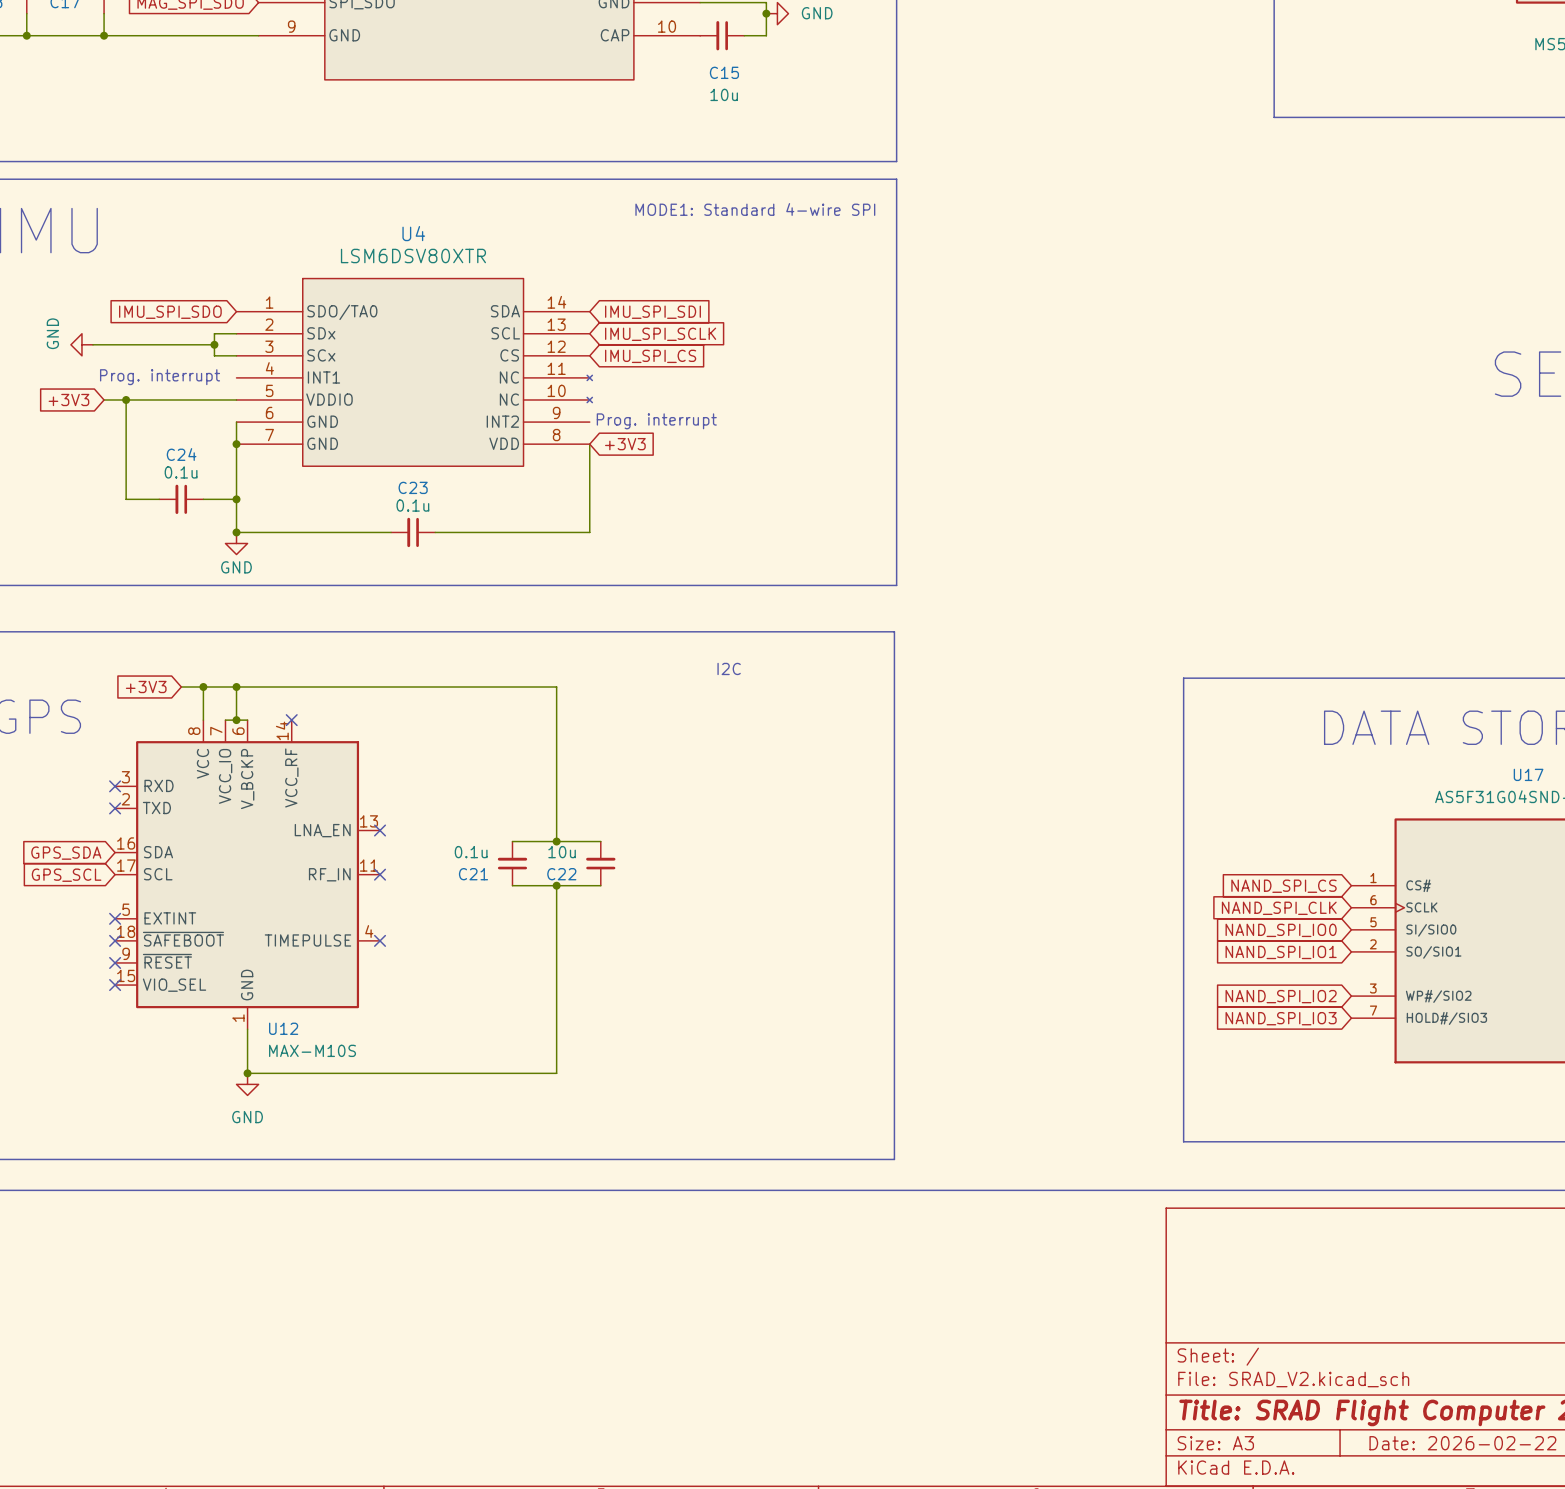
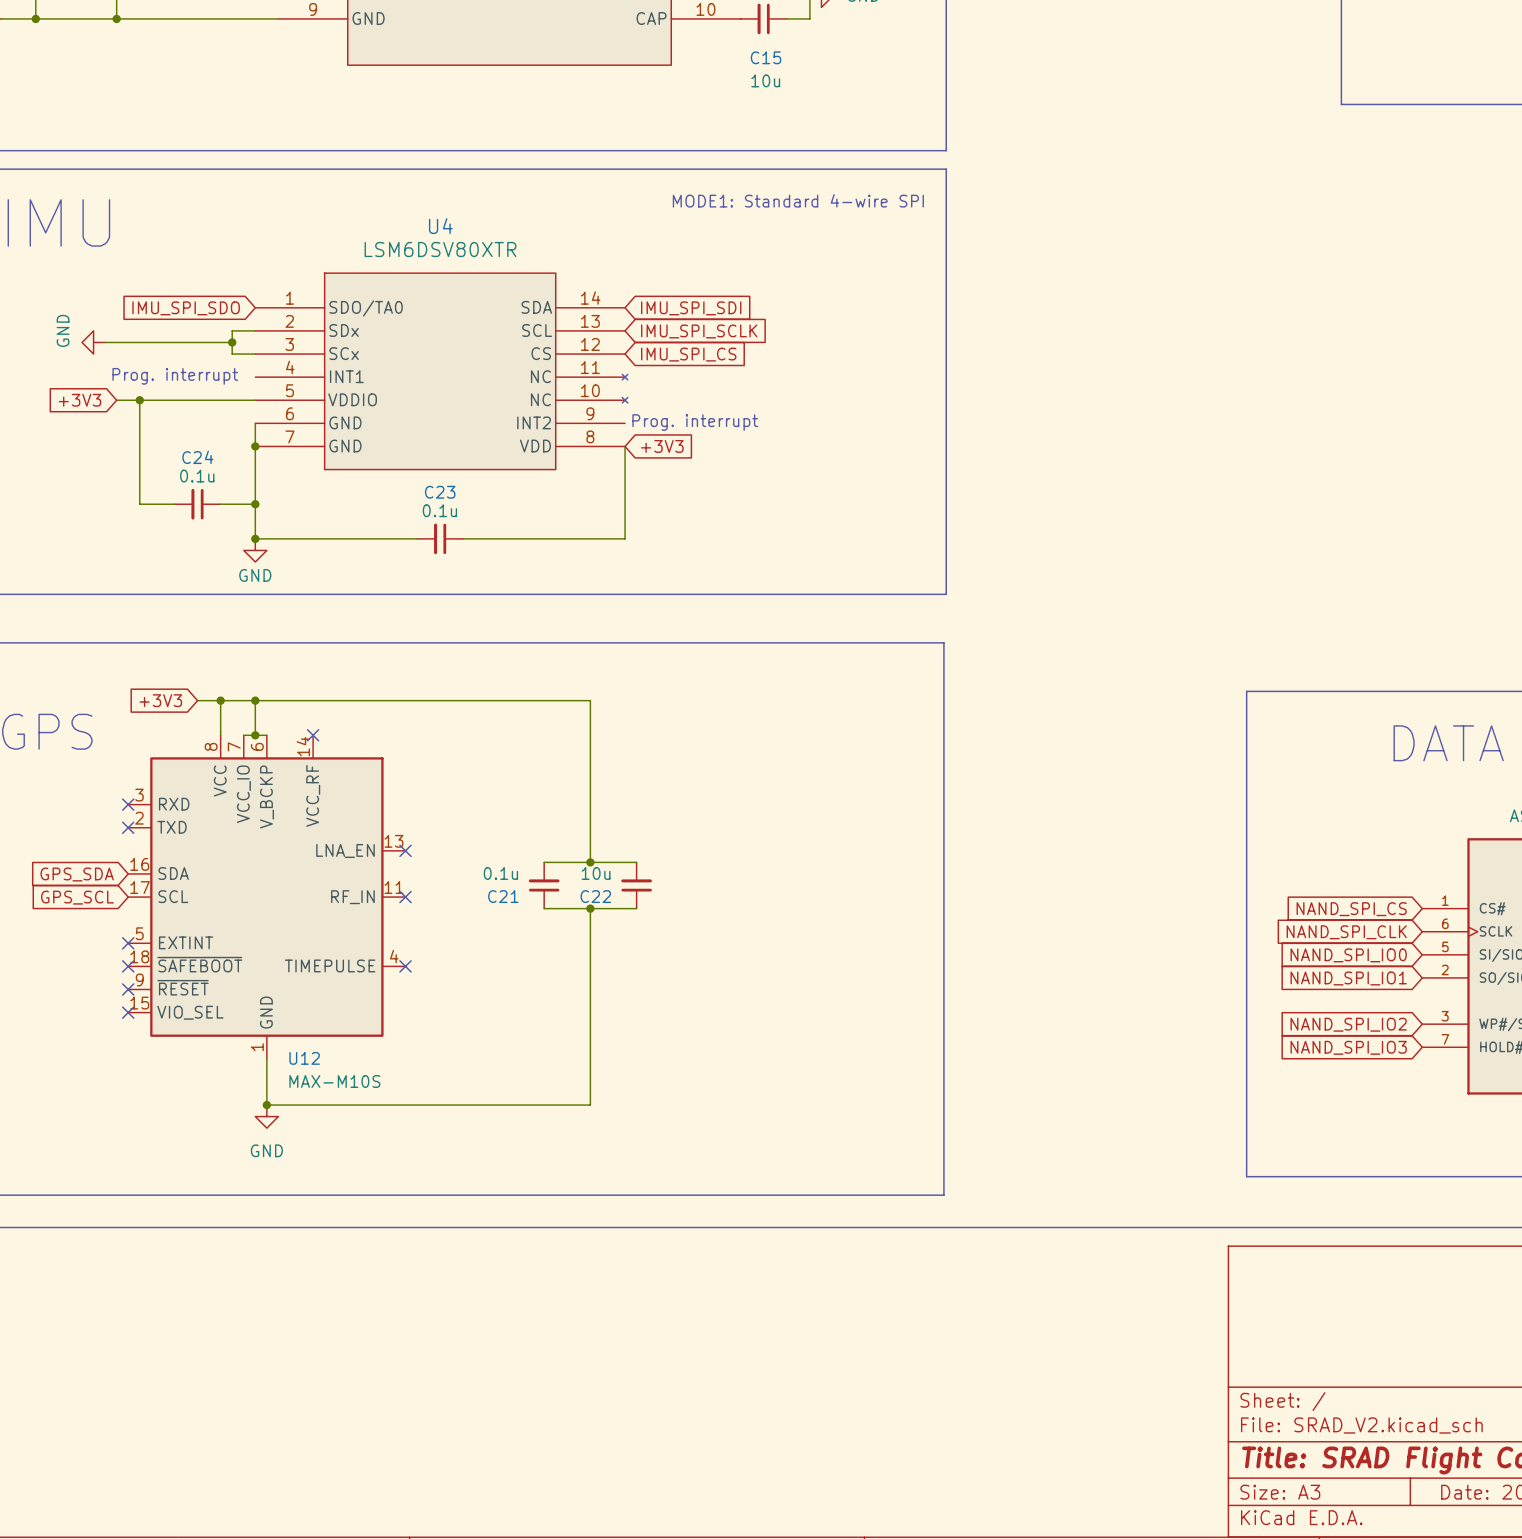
text: I2C (729, 668) -> none

